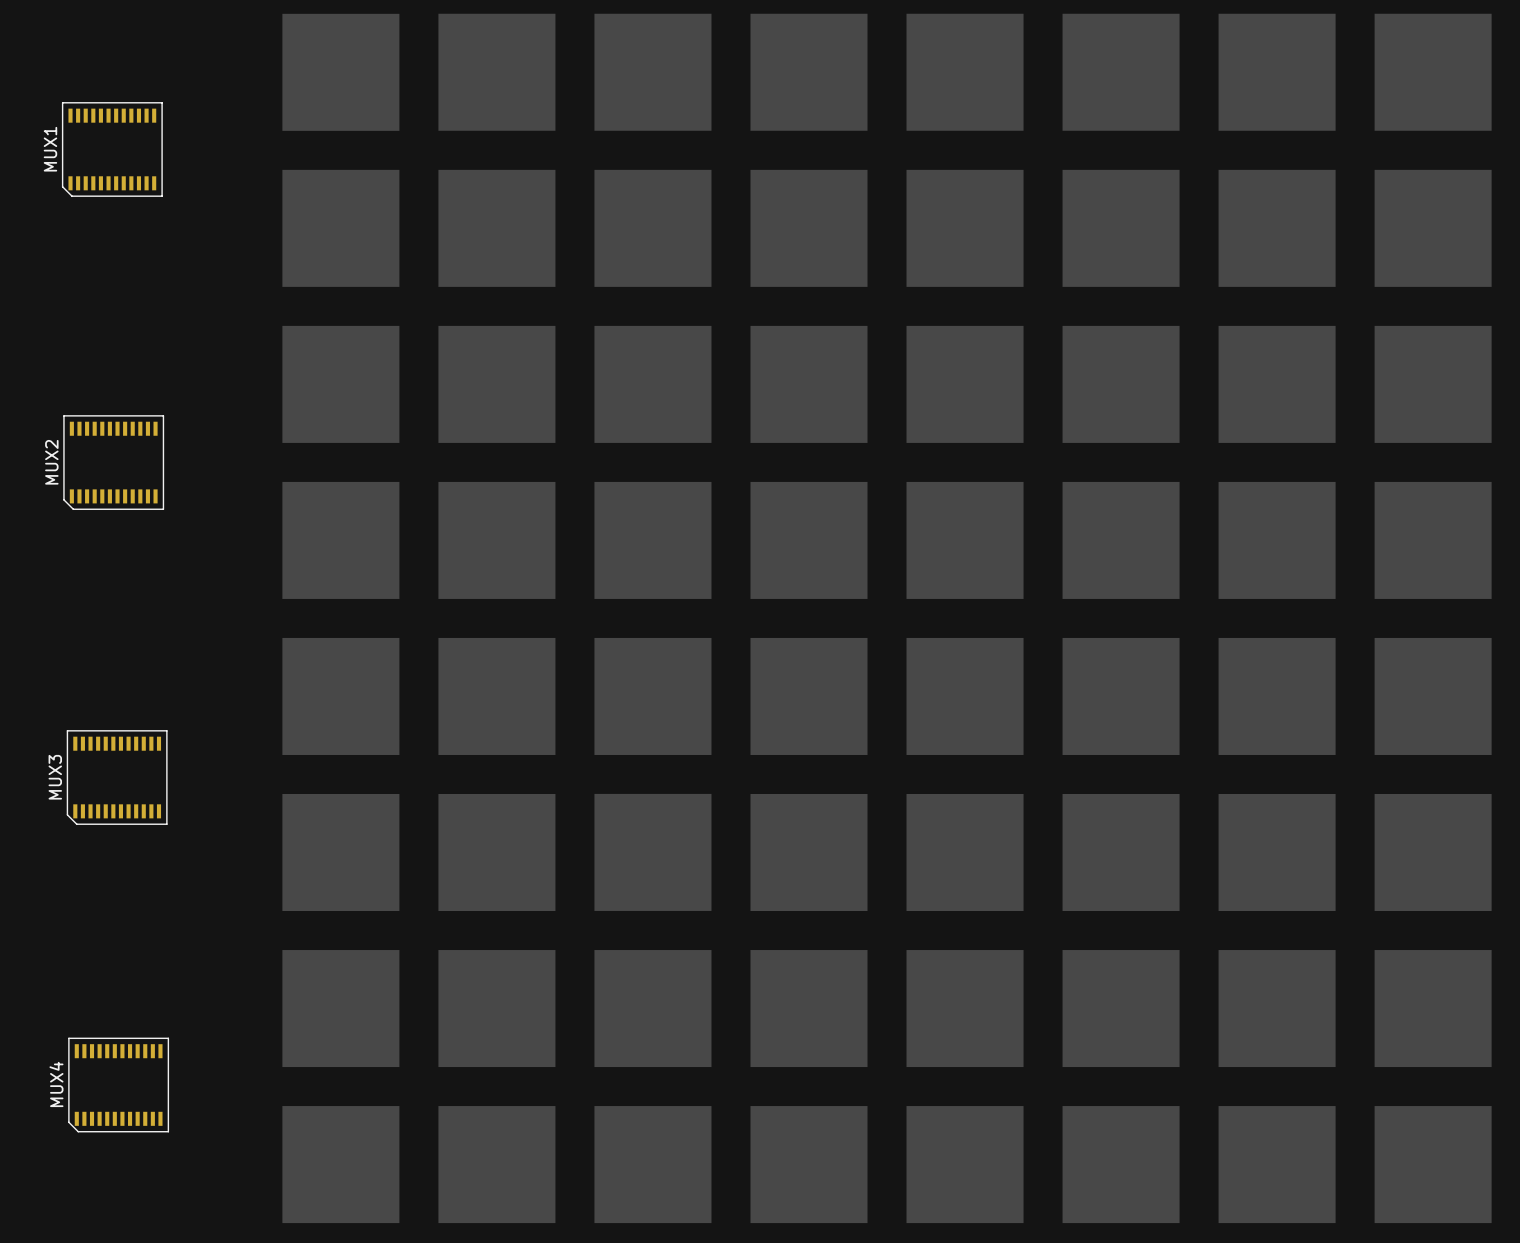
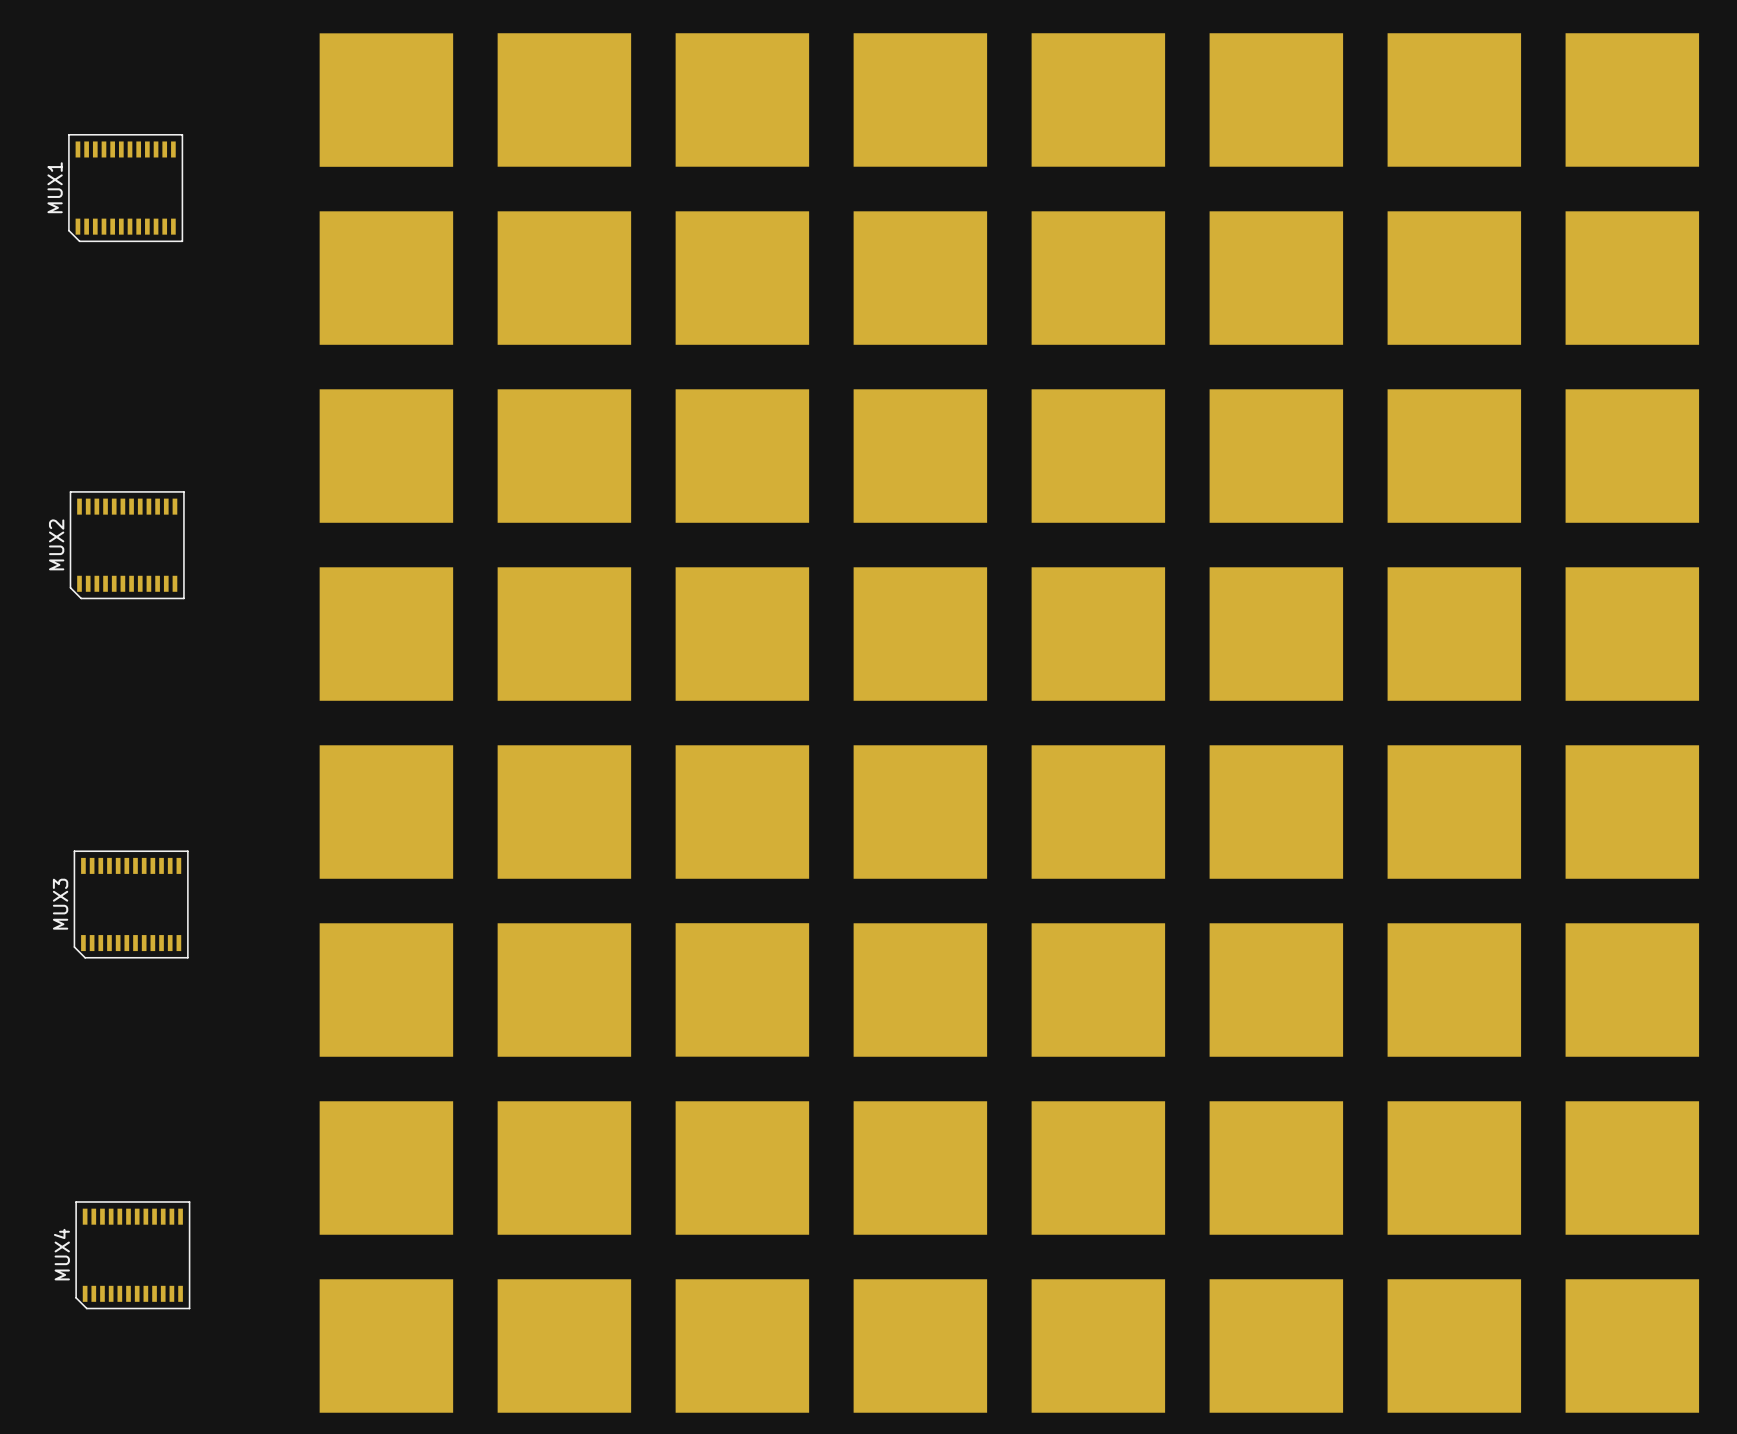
drawing: [282, 13, 400, 131] -> none
drawing: [438, 13, 556, 131] -> none
drawing: [594, 13, 712, 131] -> none
drawing: [750, 13, 868, 131] -> none
drawing: [906, 13, 1024, 131] -> none
drawing: [1062, 13, 1180, 131] -> none
drawing: [1218, 13, 1336, 131] -> none
drawing: [1374, 13, 1492, 131] -> none
part: none -> (386, 100)
part: none -> (564, 99)
part: none -> (742, 99)
part: none -> (920, 99)
part: none -> (1098, 99)
part: none -> (1276, 99)
part: none -> (1454, 99)
part: none -> (1632, 99)
drawing: [282, 169, 400, 287] -> none
drawing: [438, 169, 556, 287] -> none
drawing: [594, 169, 712, 287] -> none
drawing: [750, 169, 868, 287] -> none
drawing: [906, 169, 1024, 287] -> none
drawing: [1062, 169, 1180, 287] -> none
drawing: [1218, 169, 1336, 287] -> none
drawing: [1374, 169, 1492, 287] -> none
part: none -> (386, 278)
part: none -> (564, 278)
part: none -> (742, 278)
part: none -> (920, 278)
part: none -> (1098, 278)
part: none -> (1276, 278)
part: none -> (1454, 278)
part: none -> (1632, 278)
drawing: [282, 325, 400, 443] -> none
drawing: [438, 325, 556, 443] -> none
drawing: [594, 325, 712, 443] -> none
drawing: [750, 325, 868, 443] -> none
drawing: [906, 325, 1024, 443] -> none
drawing: [1062, 325, 1180, 443] -> none
drawing: [1218, 325, 1336, 443] -> none
drawing: [1374, 325, 1492, 443] -> none
part: none -> (386, 456)
part: none -> (564, 456)
part: none -> (742, 456)
part: none -> (920, 456)
part: none -> (1098, 456)
part: none -> (1276, 456)
part: none -> (1454, 456)
part: none -> (1632, 456)
drawing: [282, 481, 400, 599] -> none
drawing: [438, 481, 556, 599] -> none
drawing: [594, 481, 712, 599] -> none
drawing: [750, 481, 868, 599] -> none
drawing: [906, 481, 1024, 599] -> none
drawing: [1062, 481, 1180, 599] -> none
drawing: [1218, 481, 1336, 599] -> none
drawing: [1374, 481, 1492, 599] -> none
part: none -> (386, 634)
part: none -> (564, 634)
part: none -> (742, 634)
part: none -> (920, 634)
part: none -> (1098, 634)
part: none -> (1276, 634)
part: none -> (1454, 634)
part: none -> (1632, 634)
drawing: [282, 637, 400, 755] -> none
drawing: [438, 637, 556, 755] -> none
drawing: [594, 637, 712, 755] -> none
drawing: [750, 637, 868, 755] -> none
drawing: [906, 637, 1024, 755] -> none
drawing: [1062, 637, 1180, 755] -> none
drawing: [1218, 637, 1336, 755] -> none
drawing: [1374, 637, 1492, 755] -> none
part: none -> (386, 812)
part: none -> (564, 812)
part: none -> (742, 812)
part: none -> (920, 812)
part: none -> (1098, 812)
part: none -> (1276, 812)
part: none -> (1454, 812)
part: none -> (1632, 812)
drawing: [282, 793, 400, 912] -> none
drawing: [438, 793, 556, 912] -> none
drawing: [594, 793, 712, 911] -> none
drawing: [750, 793, 868, 912] -> none
drawing: [906, 793, 1024, 912] -> none
drawing: [1062, 793, 1180, 912] -> none
drawing: [1218, 793, 1336, 912] -> none
drawing: [1374, 793, 1492, 912] -> none
part: none -> (386, 990)
part: none -> (564, 990)
part: none -> (742, 989)
part: none -> (920, 990)
part: none -> (1098, 990)
part: none -> (1276, 990)
part: none -> (1454, 990)
part: none -> (1632, 990)
drawing: [282, 950, 400, 1068] -> none
drawing: [438, 950, 556, 1068] -> none
drawing: [594, 950, 712, 1068] -> none
drawing: [750, 950, 868, 1068] -> none
drawing: [906, 950, 1024, 1068] -> none
drawing: [1062, 950, 1180, 1068] -> none
drawing: [1218, 950, 1336, 1068] -> none
drawing: [1374, 950, 1492, 1068] -> none
part: none -> (386, 1168)
part: none -> (564, 1168)
part: none -> (742, 1168)
part: none -> (920, 1168)
part: none -> (1098, 1168)
part: none -> (1276, 1168)
part: none -> (1454, 1168)
part: none -> (1632, 1168)
drawing: [282, 1106, 400, 1224] -> none
drawing: [438, 1106, 556, 1224] -> none
drawing: [594, 1106, 712, 1224] -> none
drawing: [750, 1106, 868, 1224] -> none
drawing: [906, 1106, 1024, 1224] -> none
drawing: [1062, 1106, 1180, 1224] -> none
drawing: [1218, 1106, 1336, 1224] -> none
drawing: [1374, 1106, 1492, 1224] -> none
part: none -> (386, 1345)
part: none -> (564, 1345)
part: none -> (742, 1345)
part: none -> (920, 1345)
part: none -> (1098, 1345)
part: none -> (1276, 1345)
part: none -> (1454, 1345)
part: none -> (1632, 1345)

